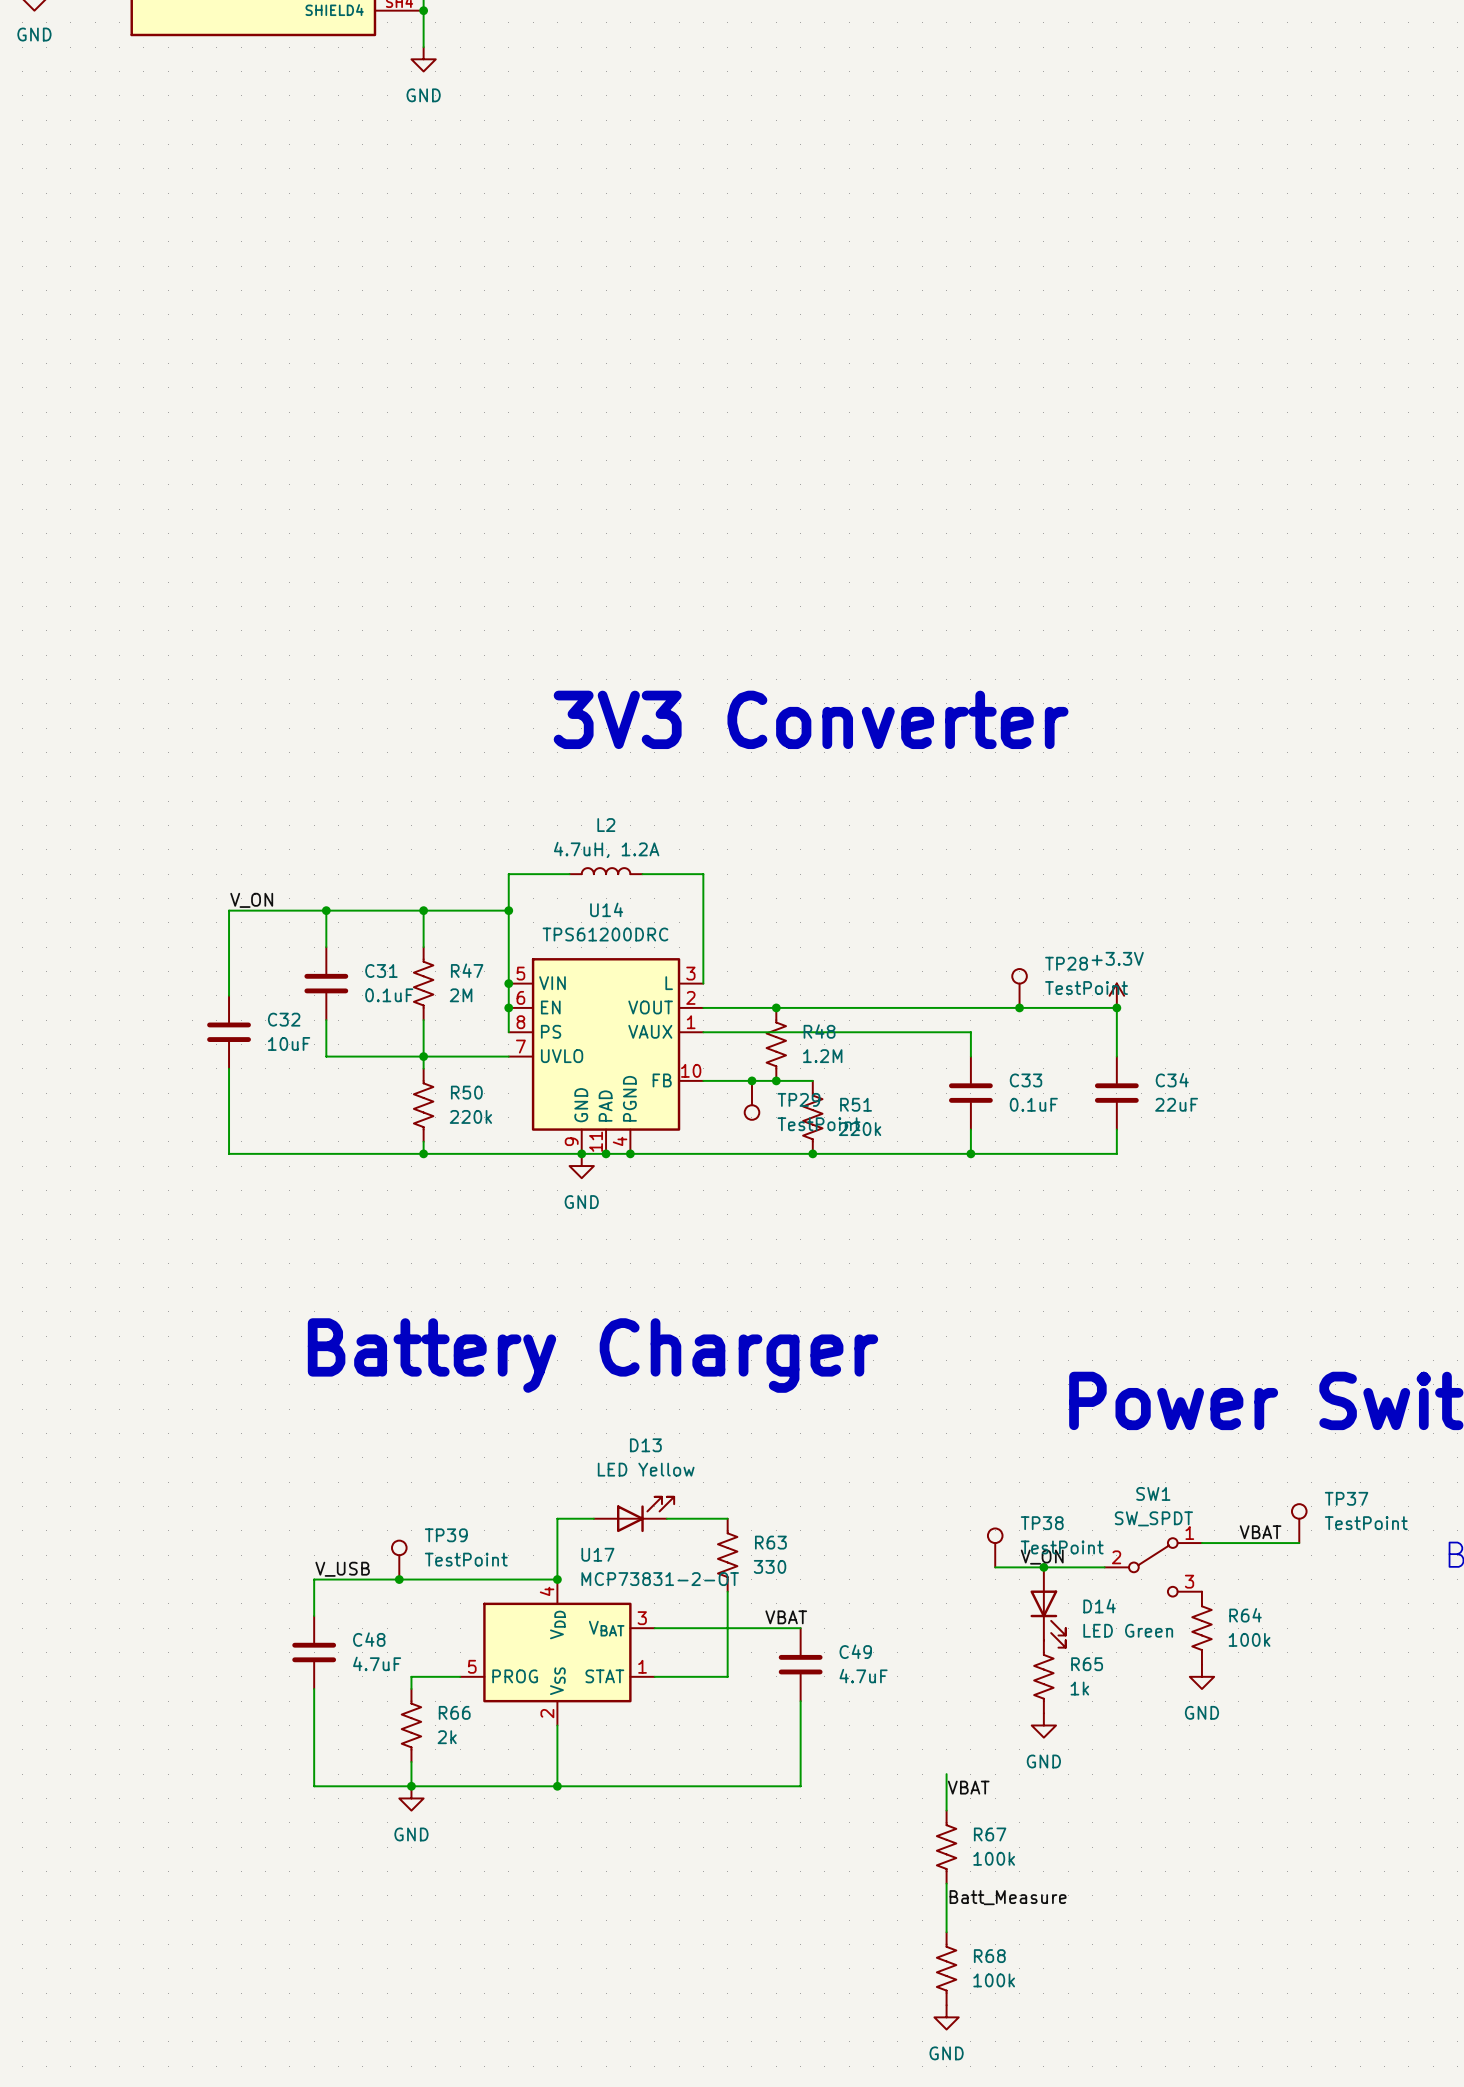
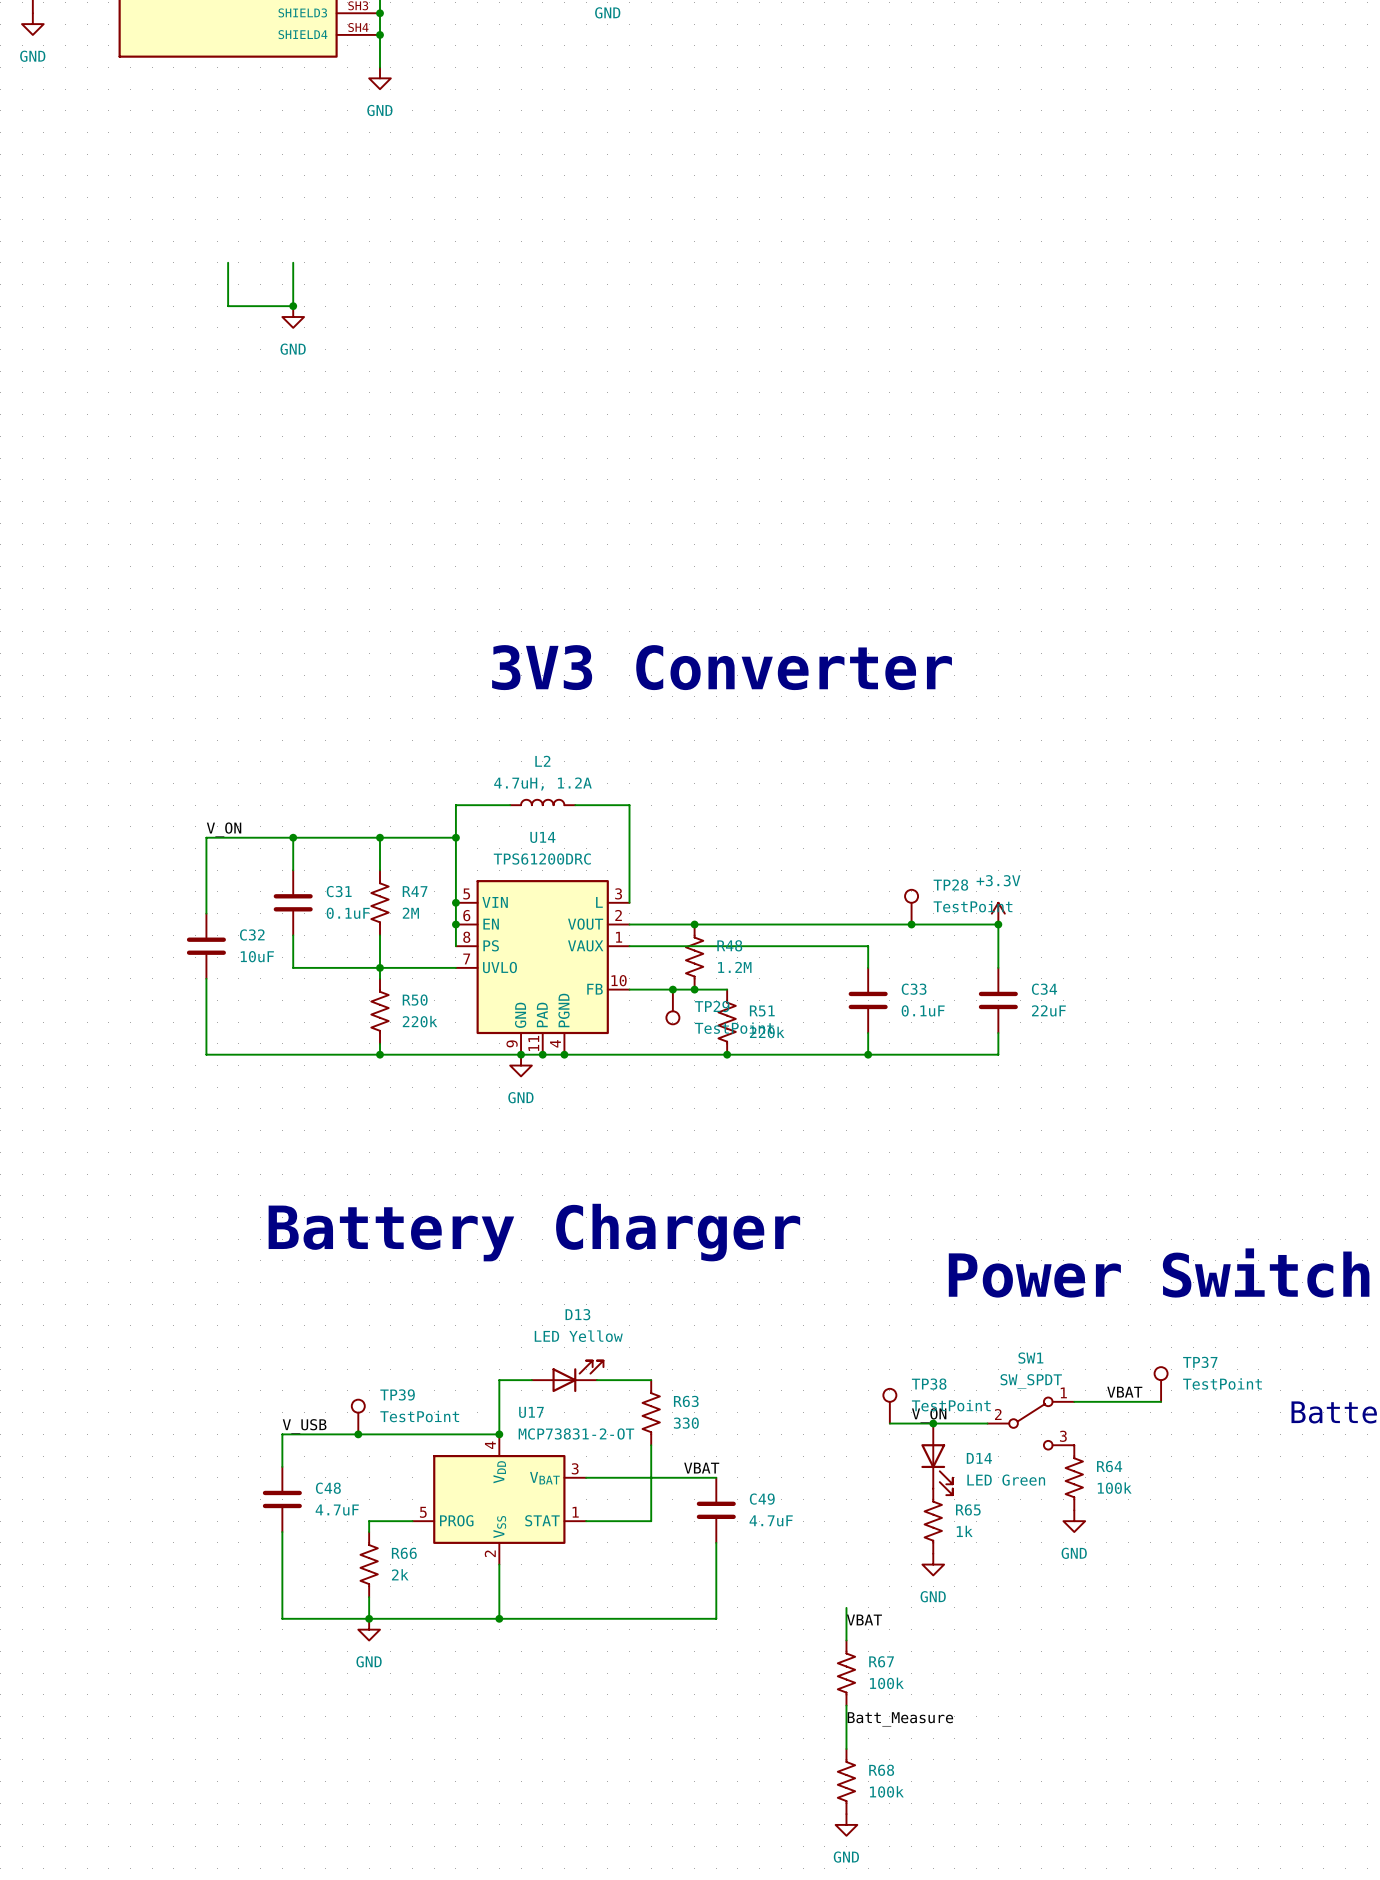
wire: none -> (228, 262) (228, 306) (293, 306) (293, 262)
junction: none -> (293, 306)
power symbol: none -> GND (293, 317)

